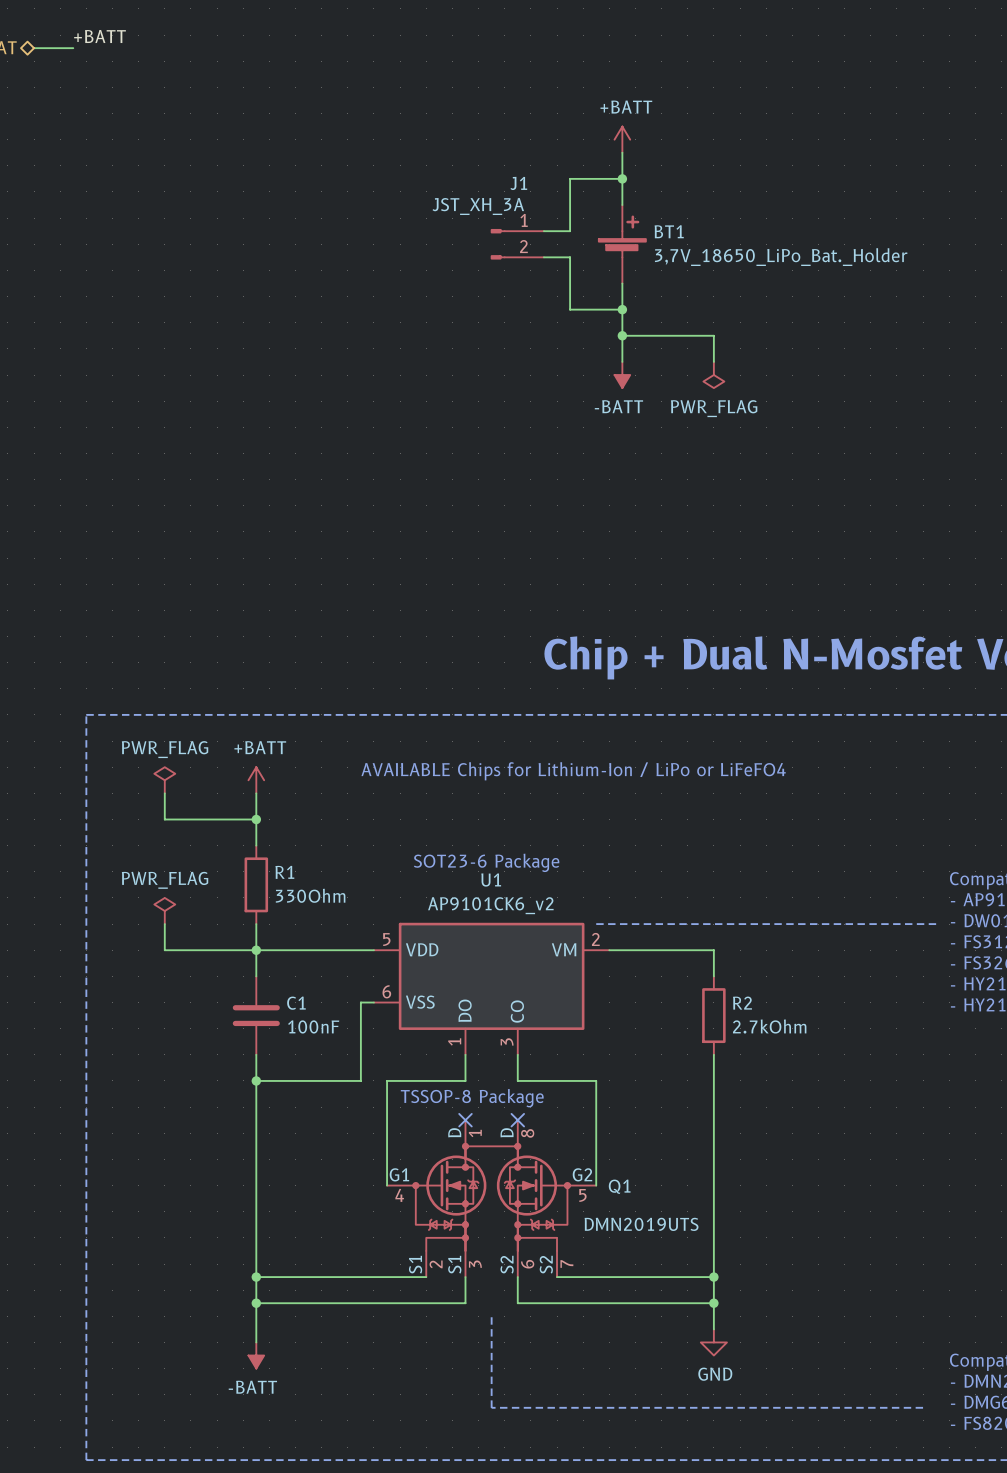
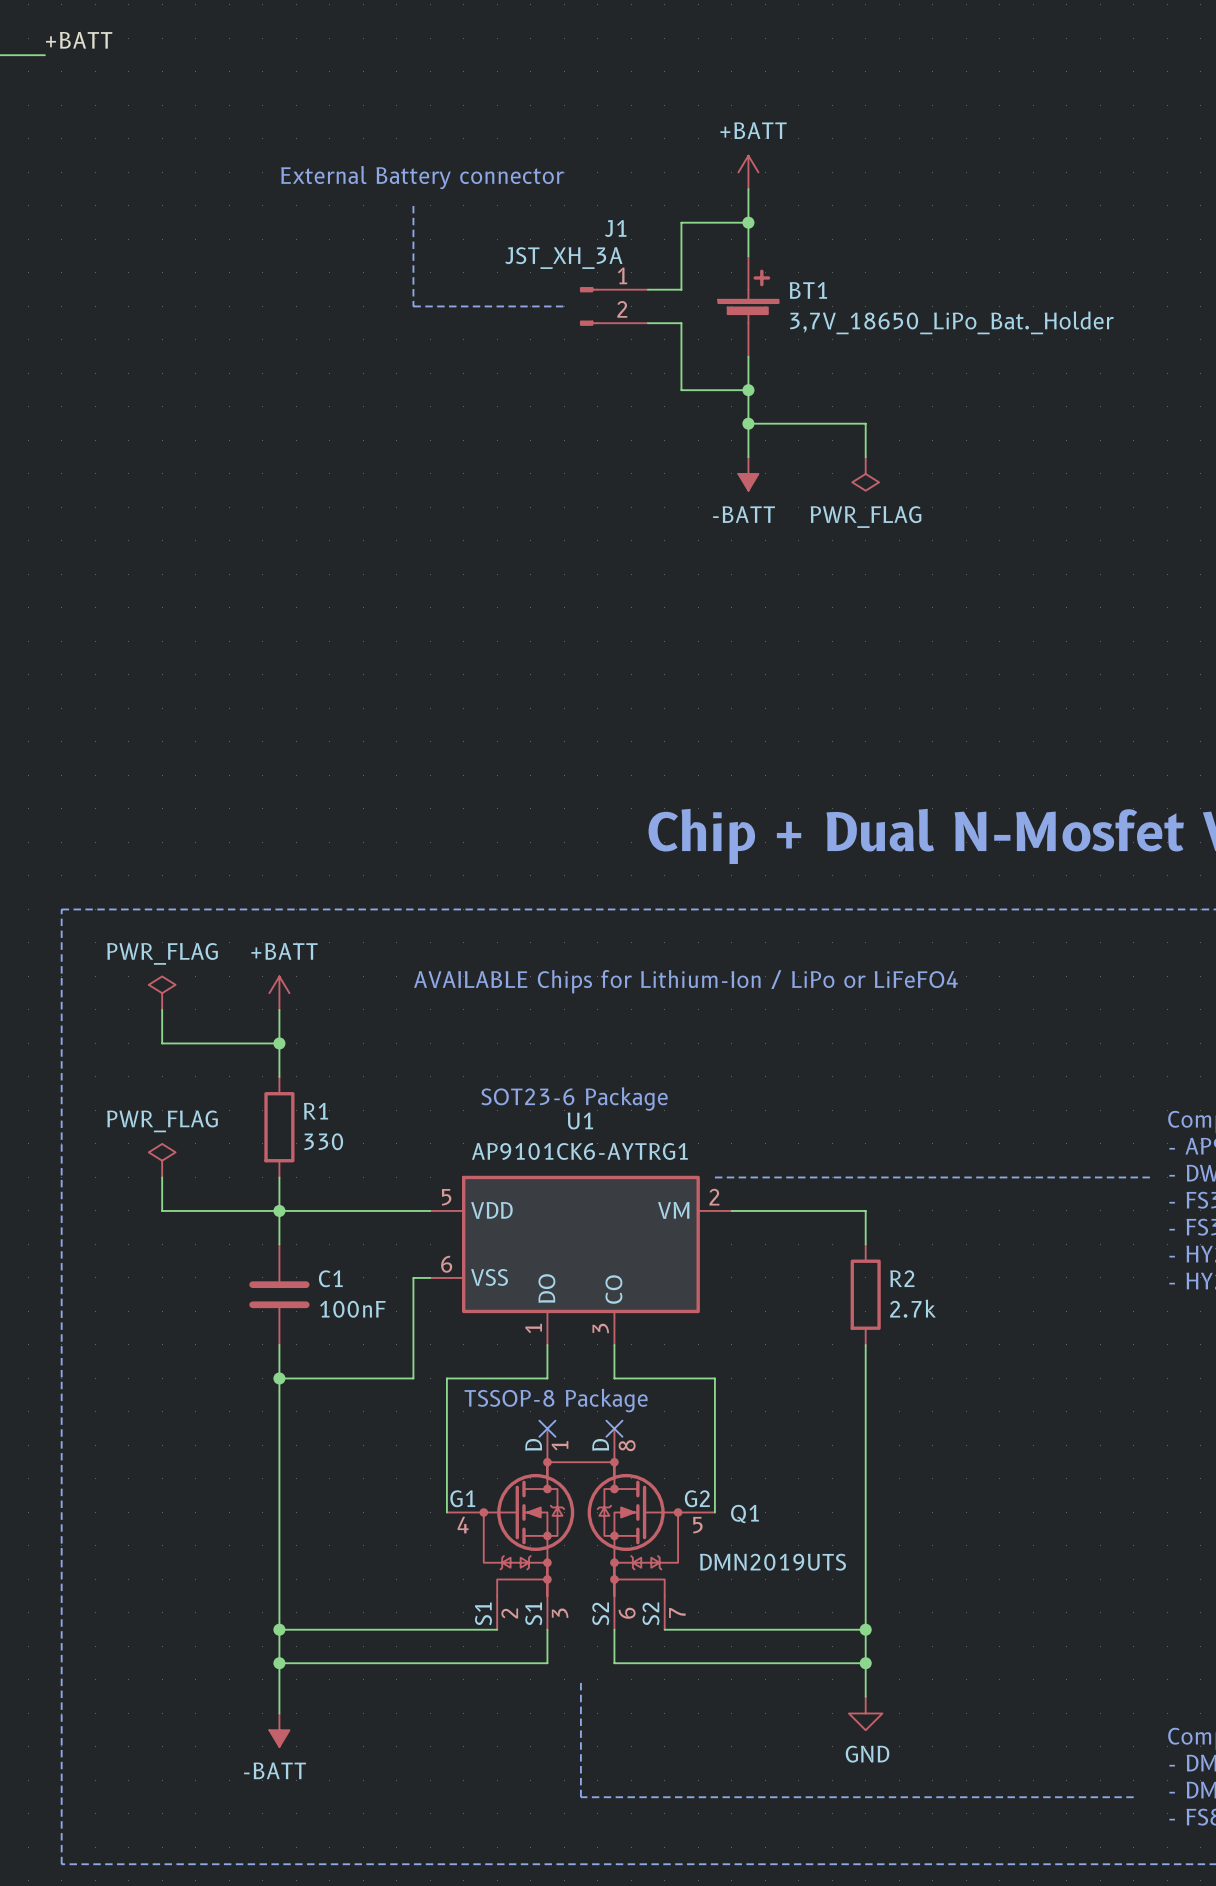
text: none -> External Battery connector (422, 177)
line: none -> (413, 205) (413, 306) (564, 306)
R1 value: 330Ohm (310, 895) -> 330 (323, 1141)
U1 value: AP9101CK6_v2 (490, 905) -> AP9101CK6-AYTRG1 (579, 1151)
R2 value: 2.7kOhm (769, 1026) -> 2.7k (913, 1308)

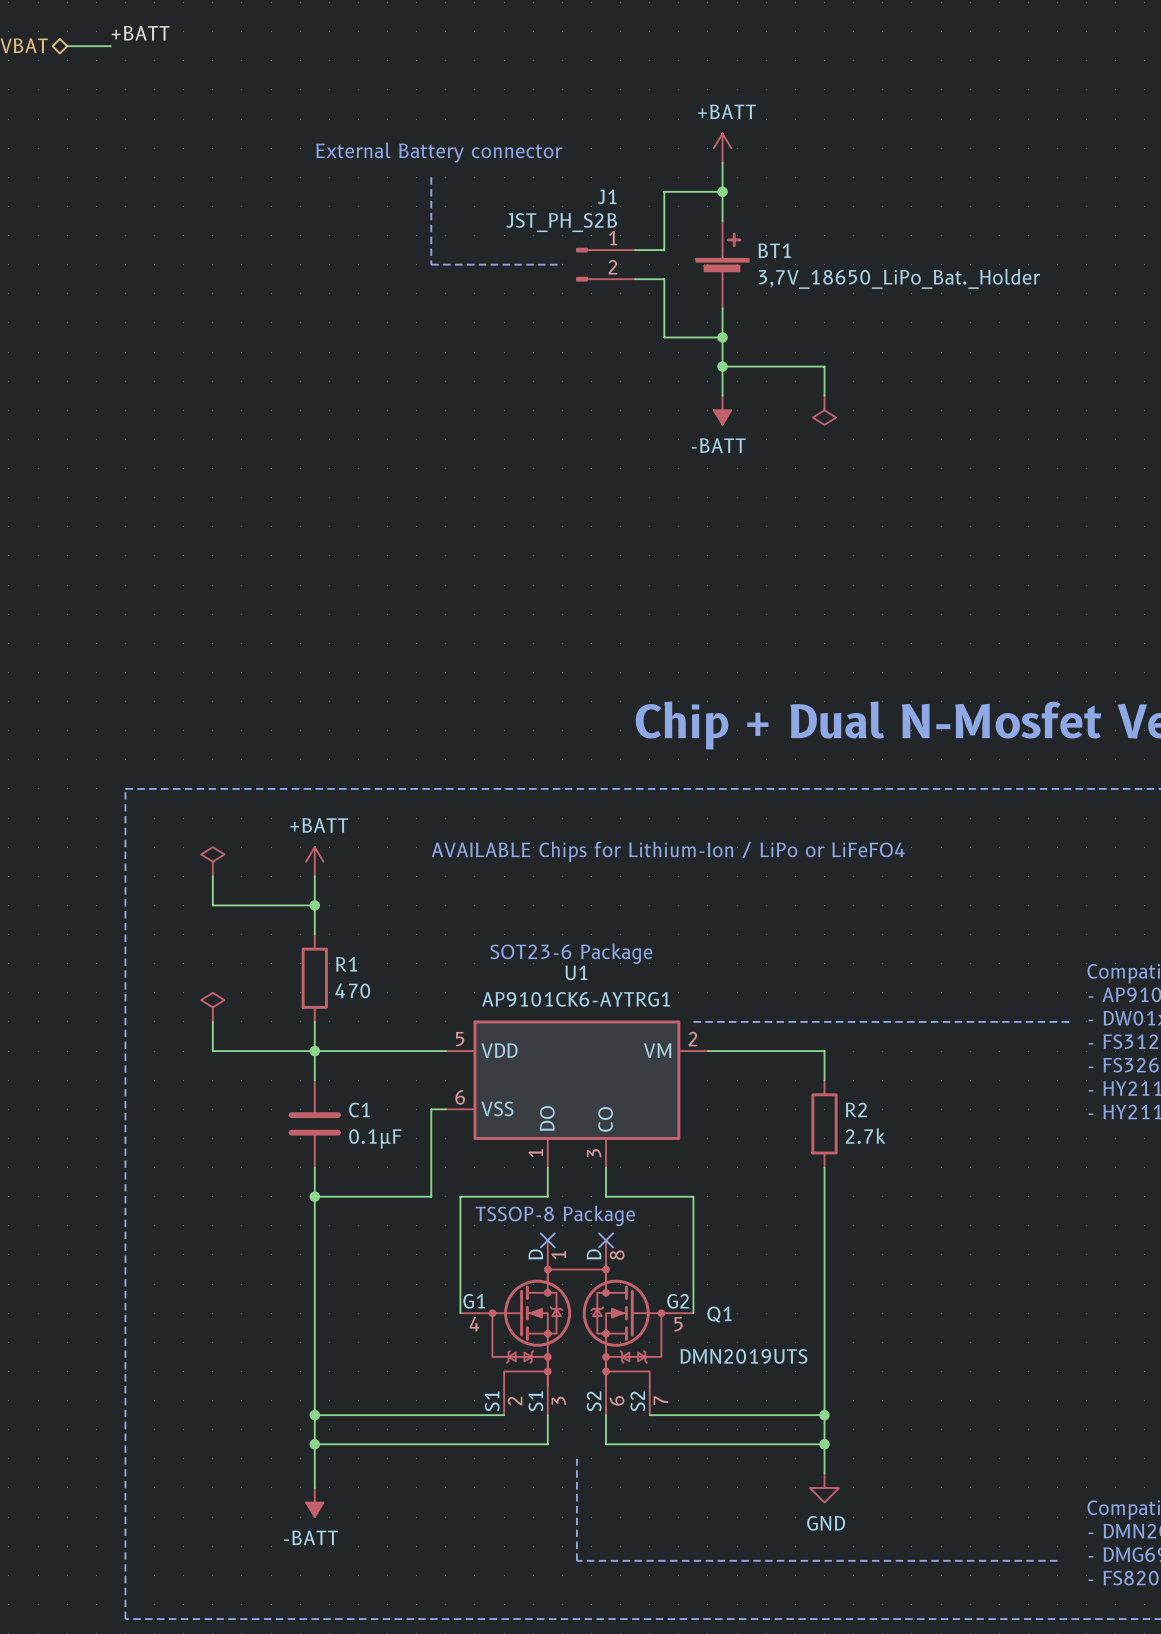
J1 value: JST_XH_3A (563, 258) -> JST_PH_S2B (561, 222)
power symbol text: PWR_FLAG (865, 517) -> none
power symbol text: PWR_FLAG (162, 953) -> none
power symbol text: PWR_FLAG (162, 1121) -> none
R1 value: 330 (323, 1141) -> 470 (352, 990)
C1 value: 100nF (352, 1309) -> 0.1µF (375, 1138)

